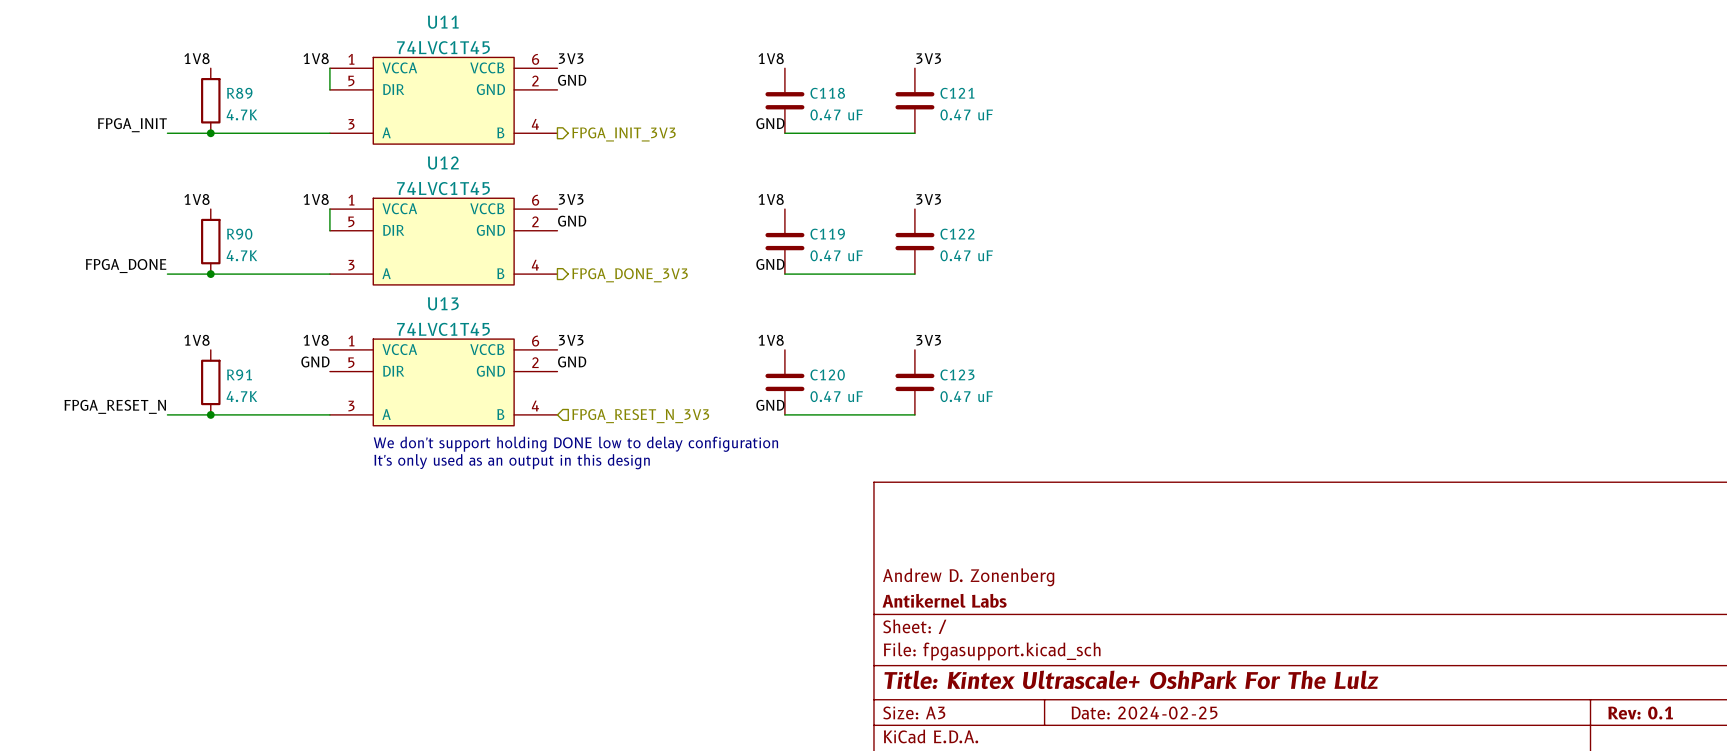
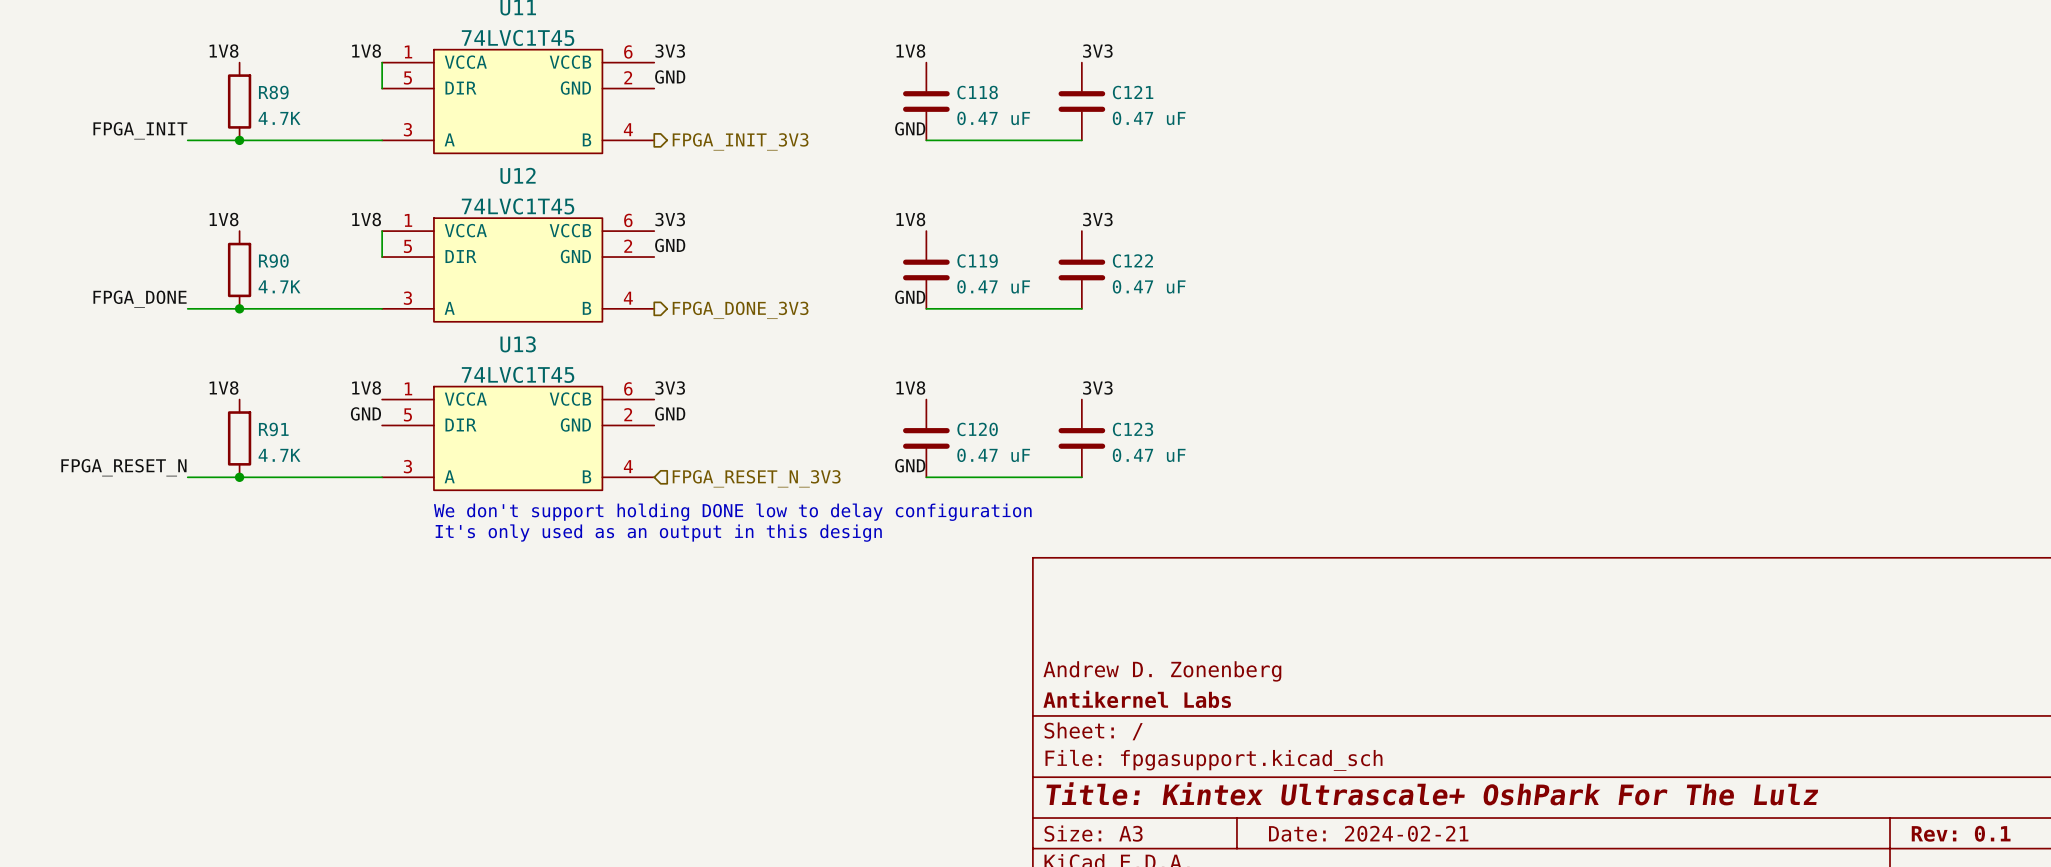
title block: Date: 2024-02-25 (1144, 712) -> Date: 2024-02-21 (1368, 833)

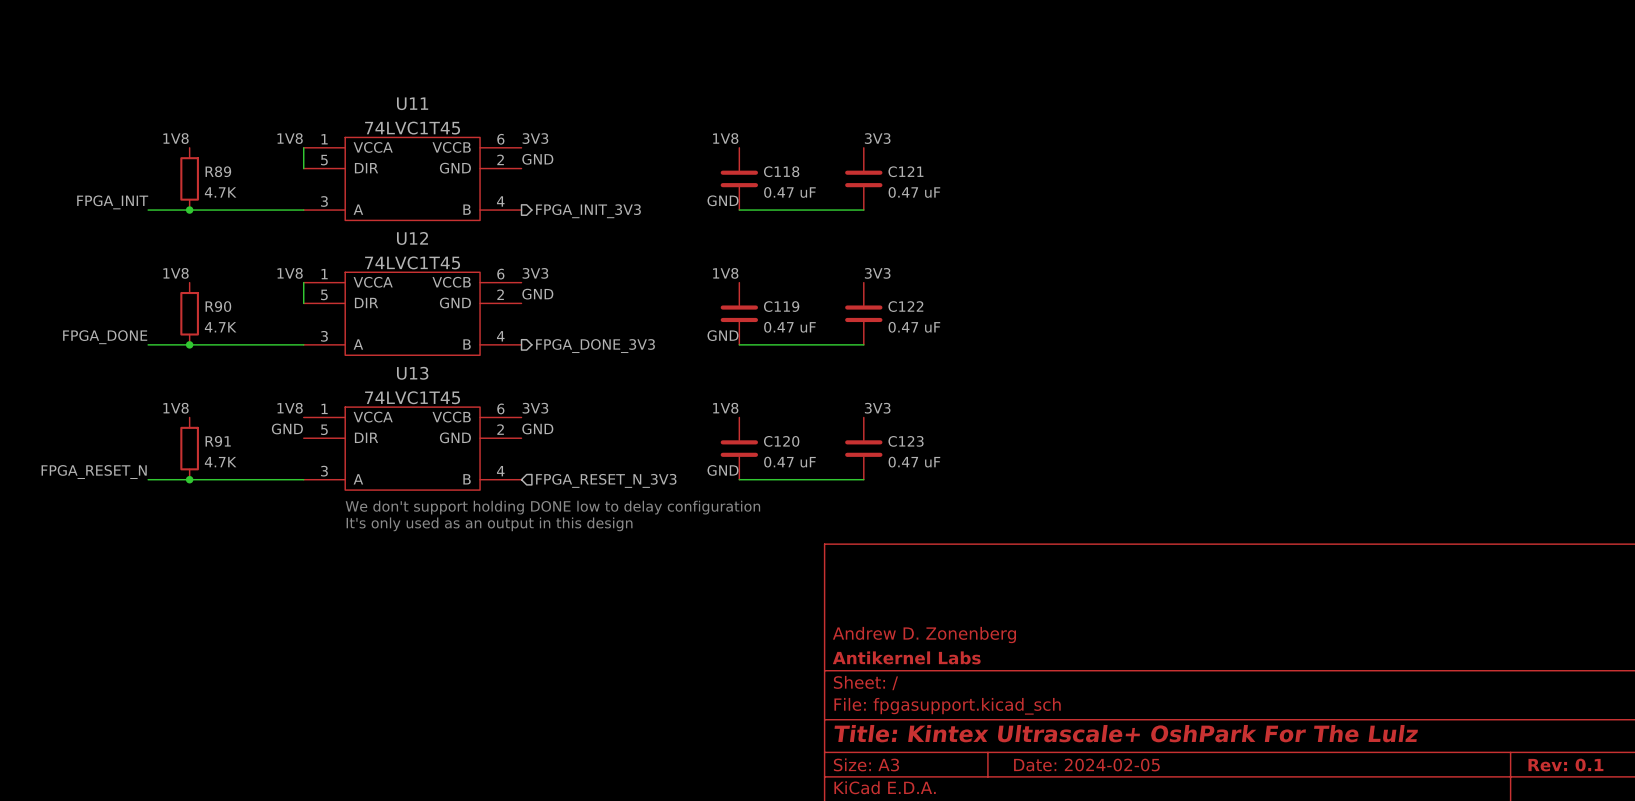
title block: Date: 2024-02-21 (1368, 833) -> Date: 2024-02-05 (1086, 765)

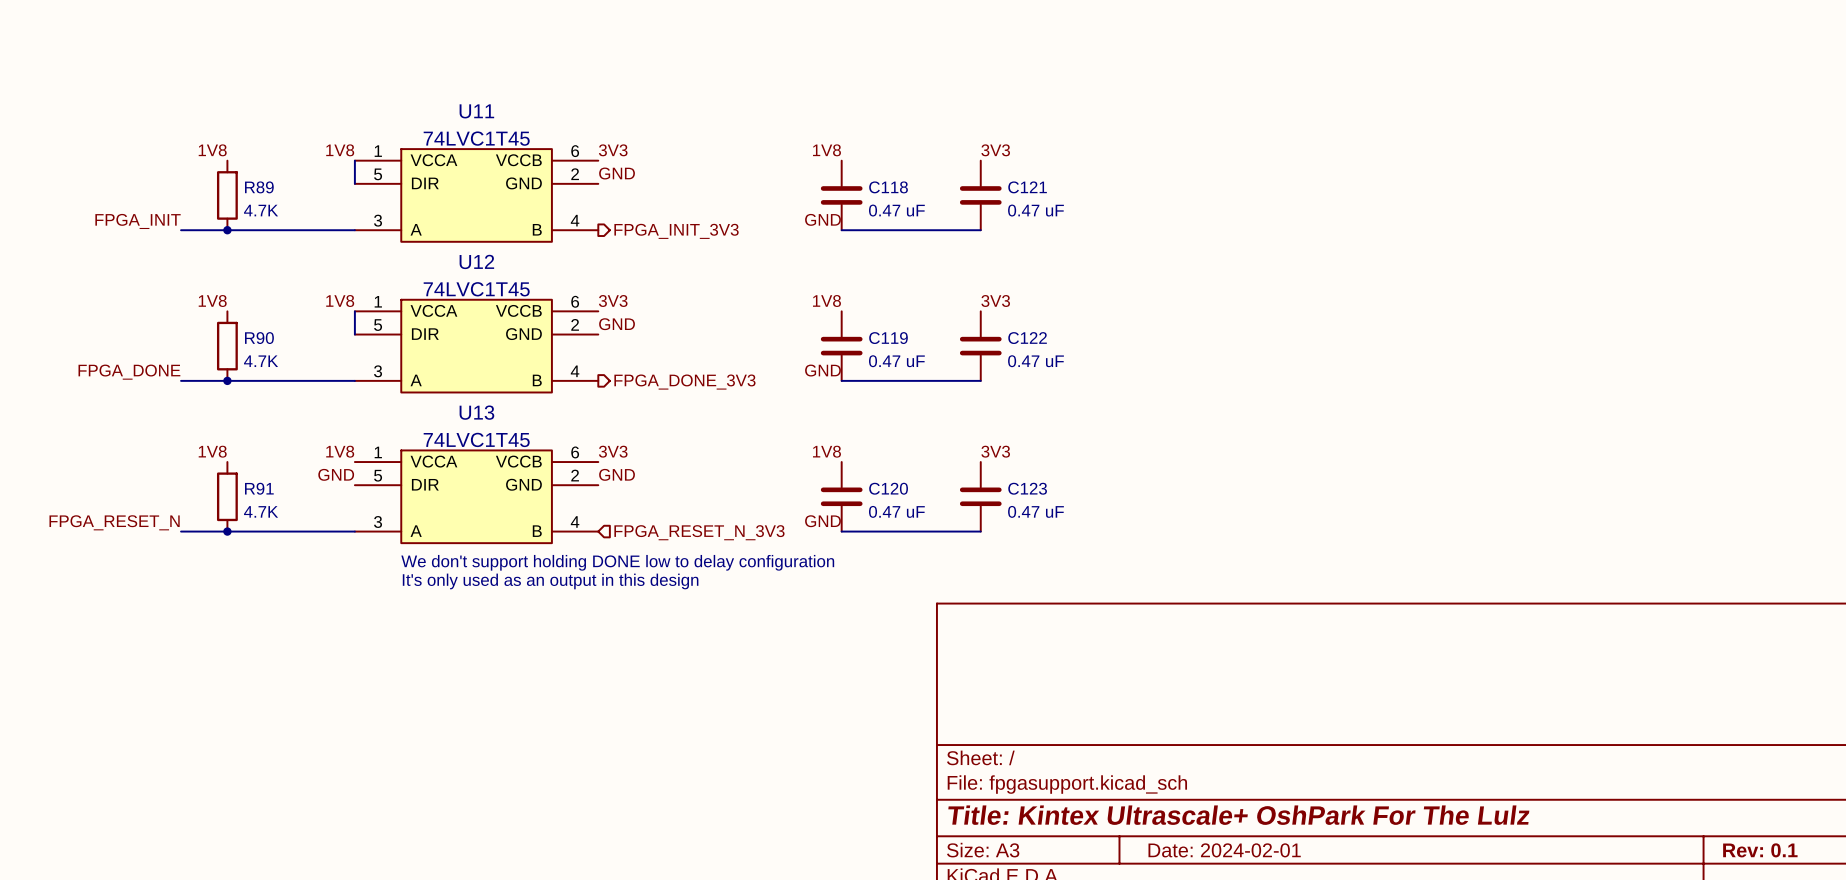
title block: Andrew D. Zonenberg (924, 635) -> none
title block: Antikernel Labs (906, 657) -> none
title block: Date: 2024-02-05 (1086, 765) -> Date: 2024-02-01 (1224, 850)

